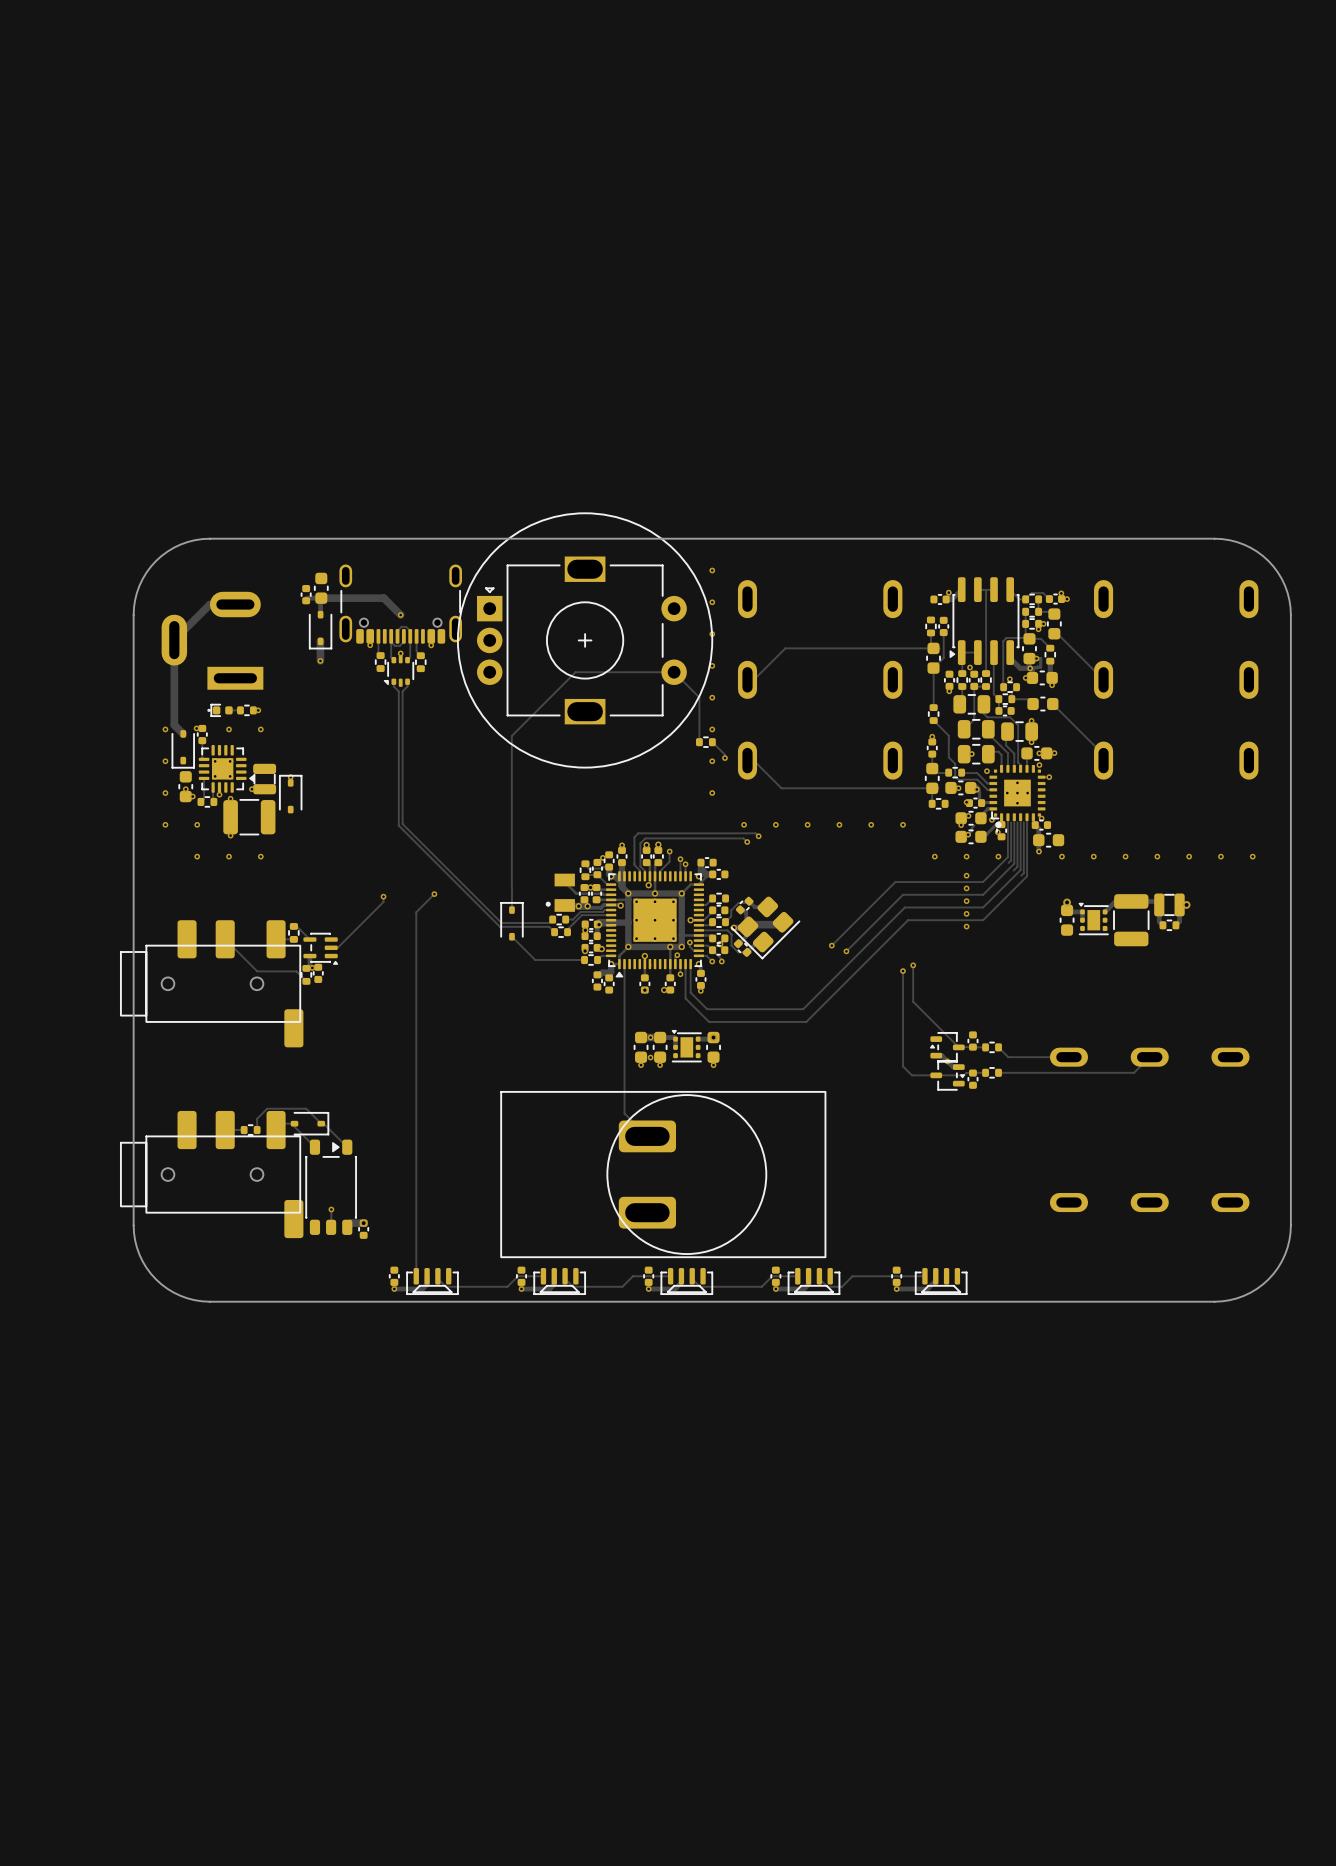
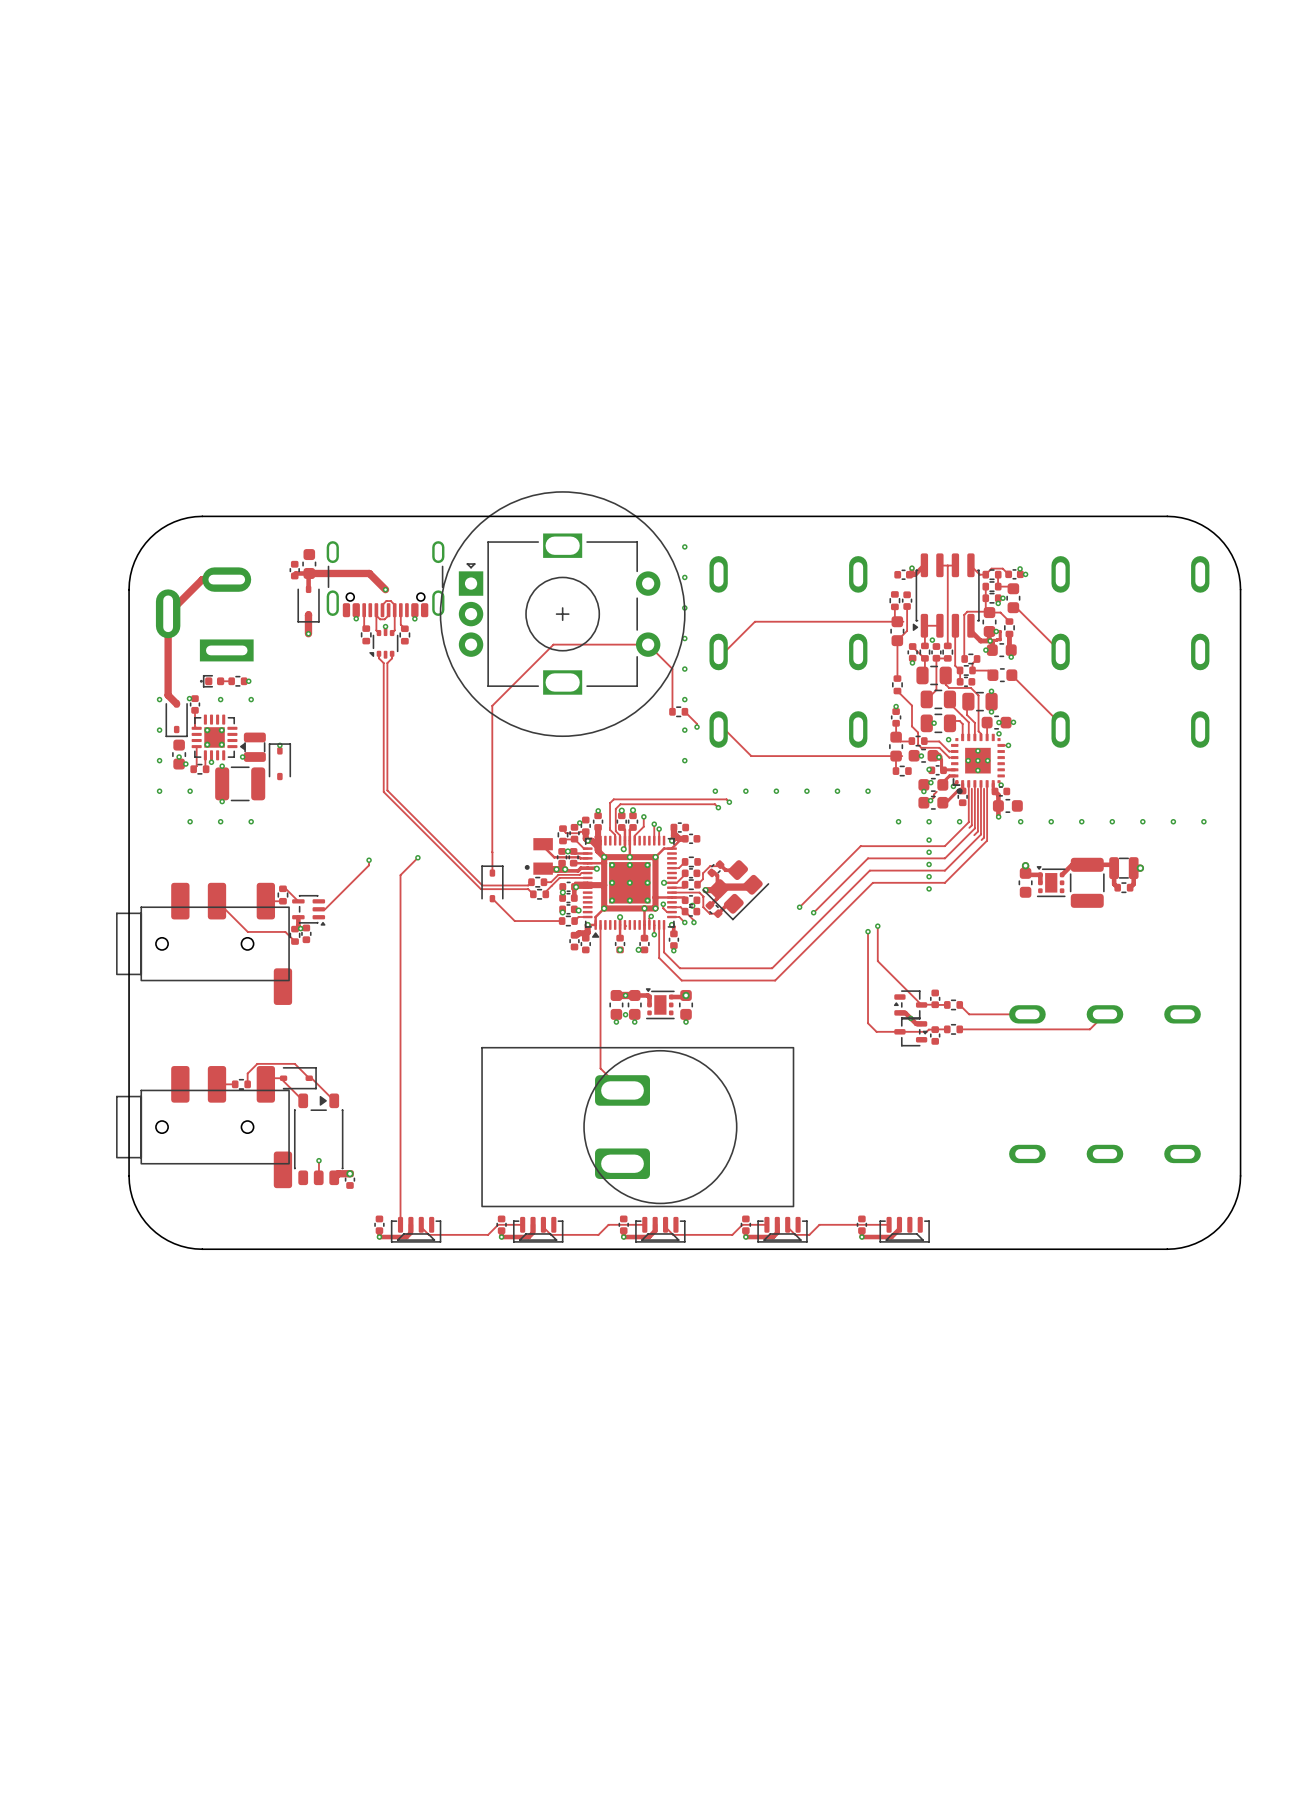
via: (1009, 679) -> none
via: (997, 832) -> none

